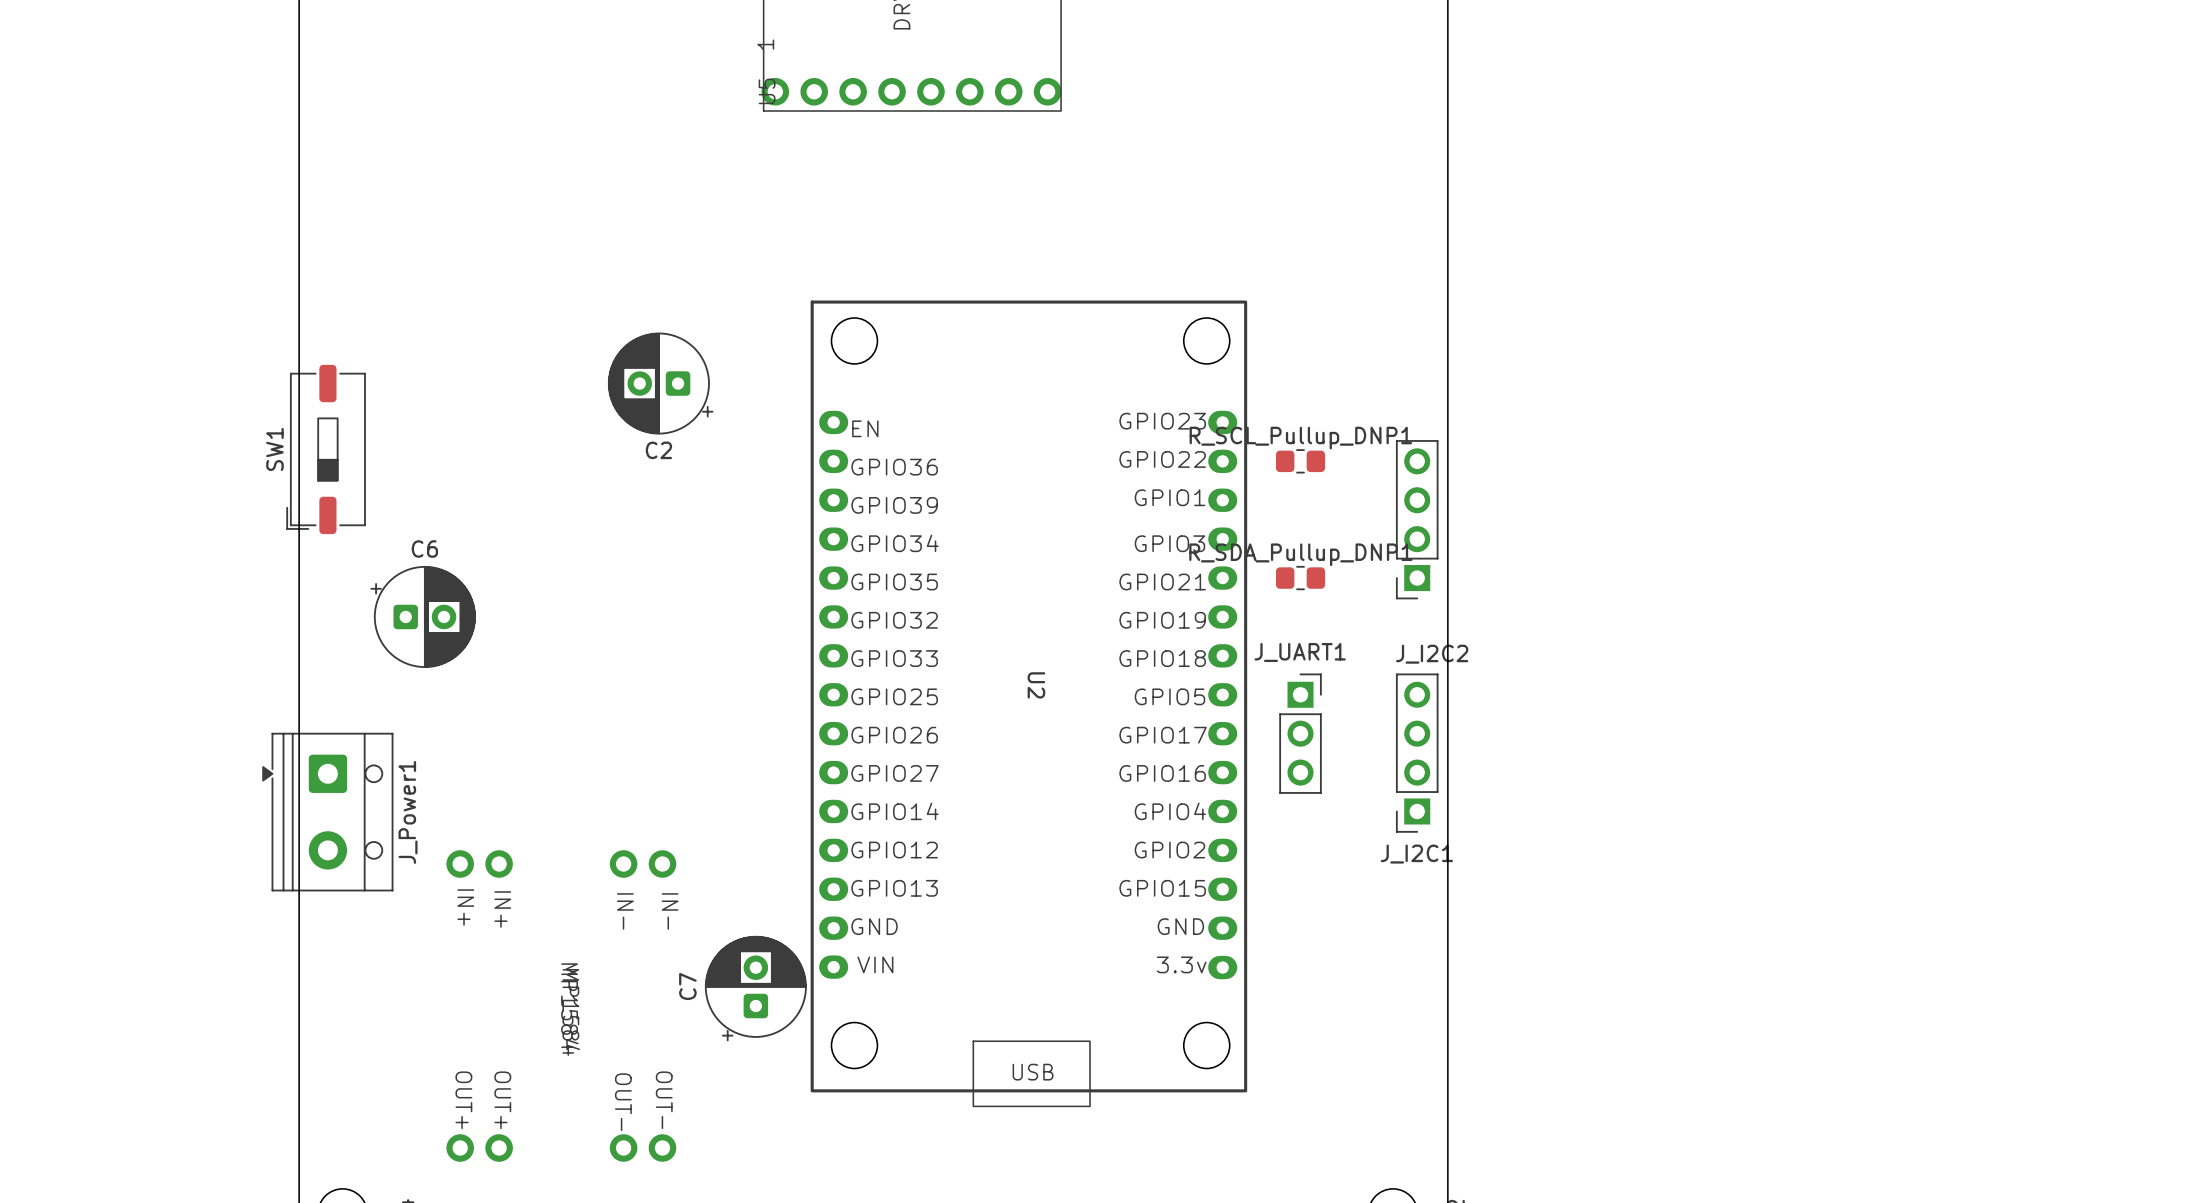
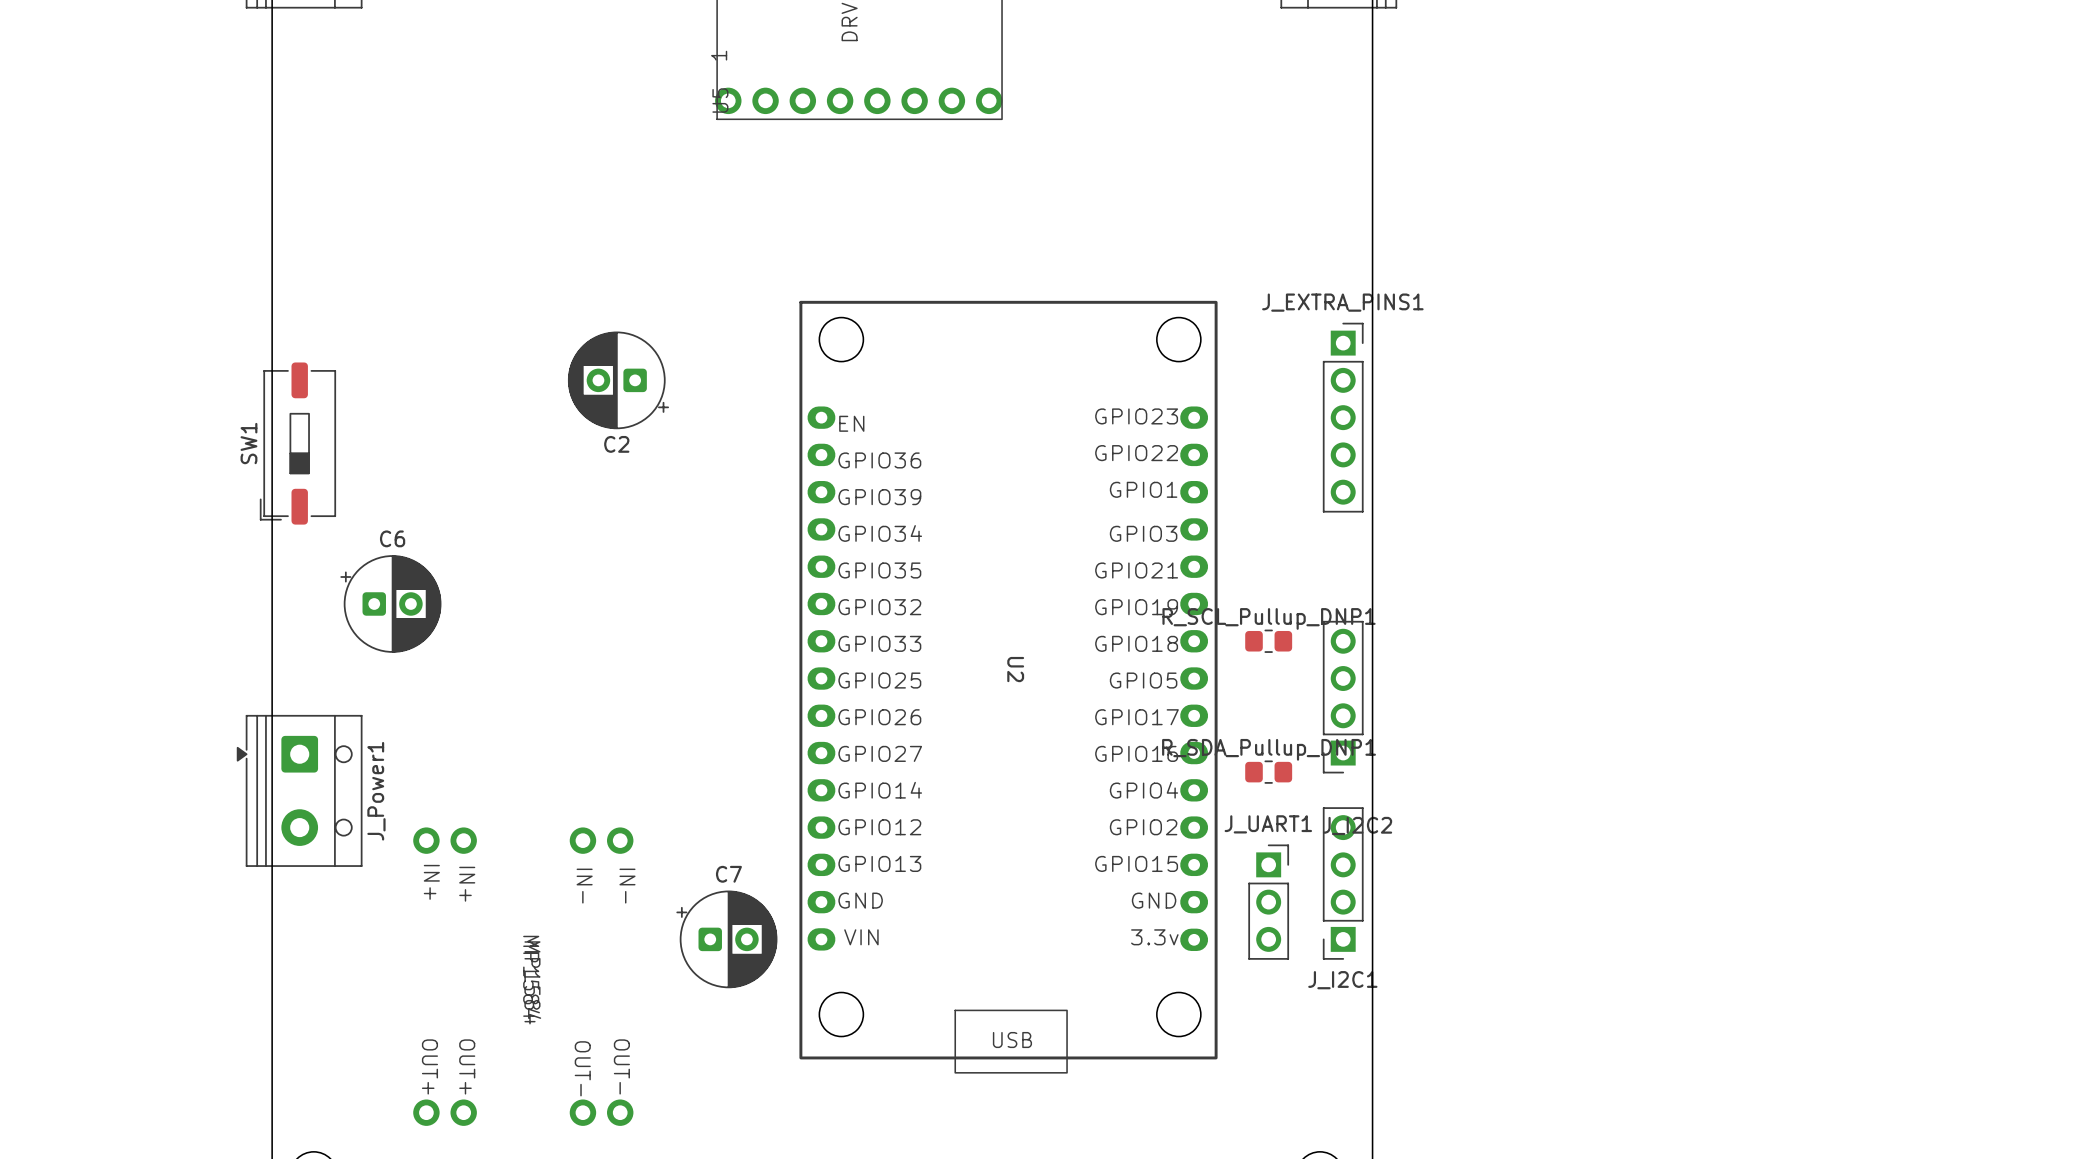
J_EXTRA_PINS1: none -> (1343, 417)
R_SCL_Pullup_DNP1 position: (1300, 461) -> (1268, 641)
J_I2C2 position: (1417, 519) -> (1343, 697)
R_SDA_Pullup_DNP1 position: (1300, 578) -> (1268, 772)
U2 position: (1028, 703) -> (1008, 687)
J_UART1 position: (1300, 733) -> (1268, 902)
J_I2C1 position: (1417, 753) -> (1343, 883)
C7 rotation: 0° (755, 988) -> 90° clockwise (726, 939)

